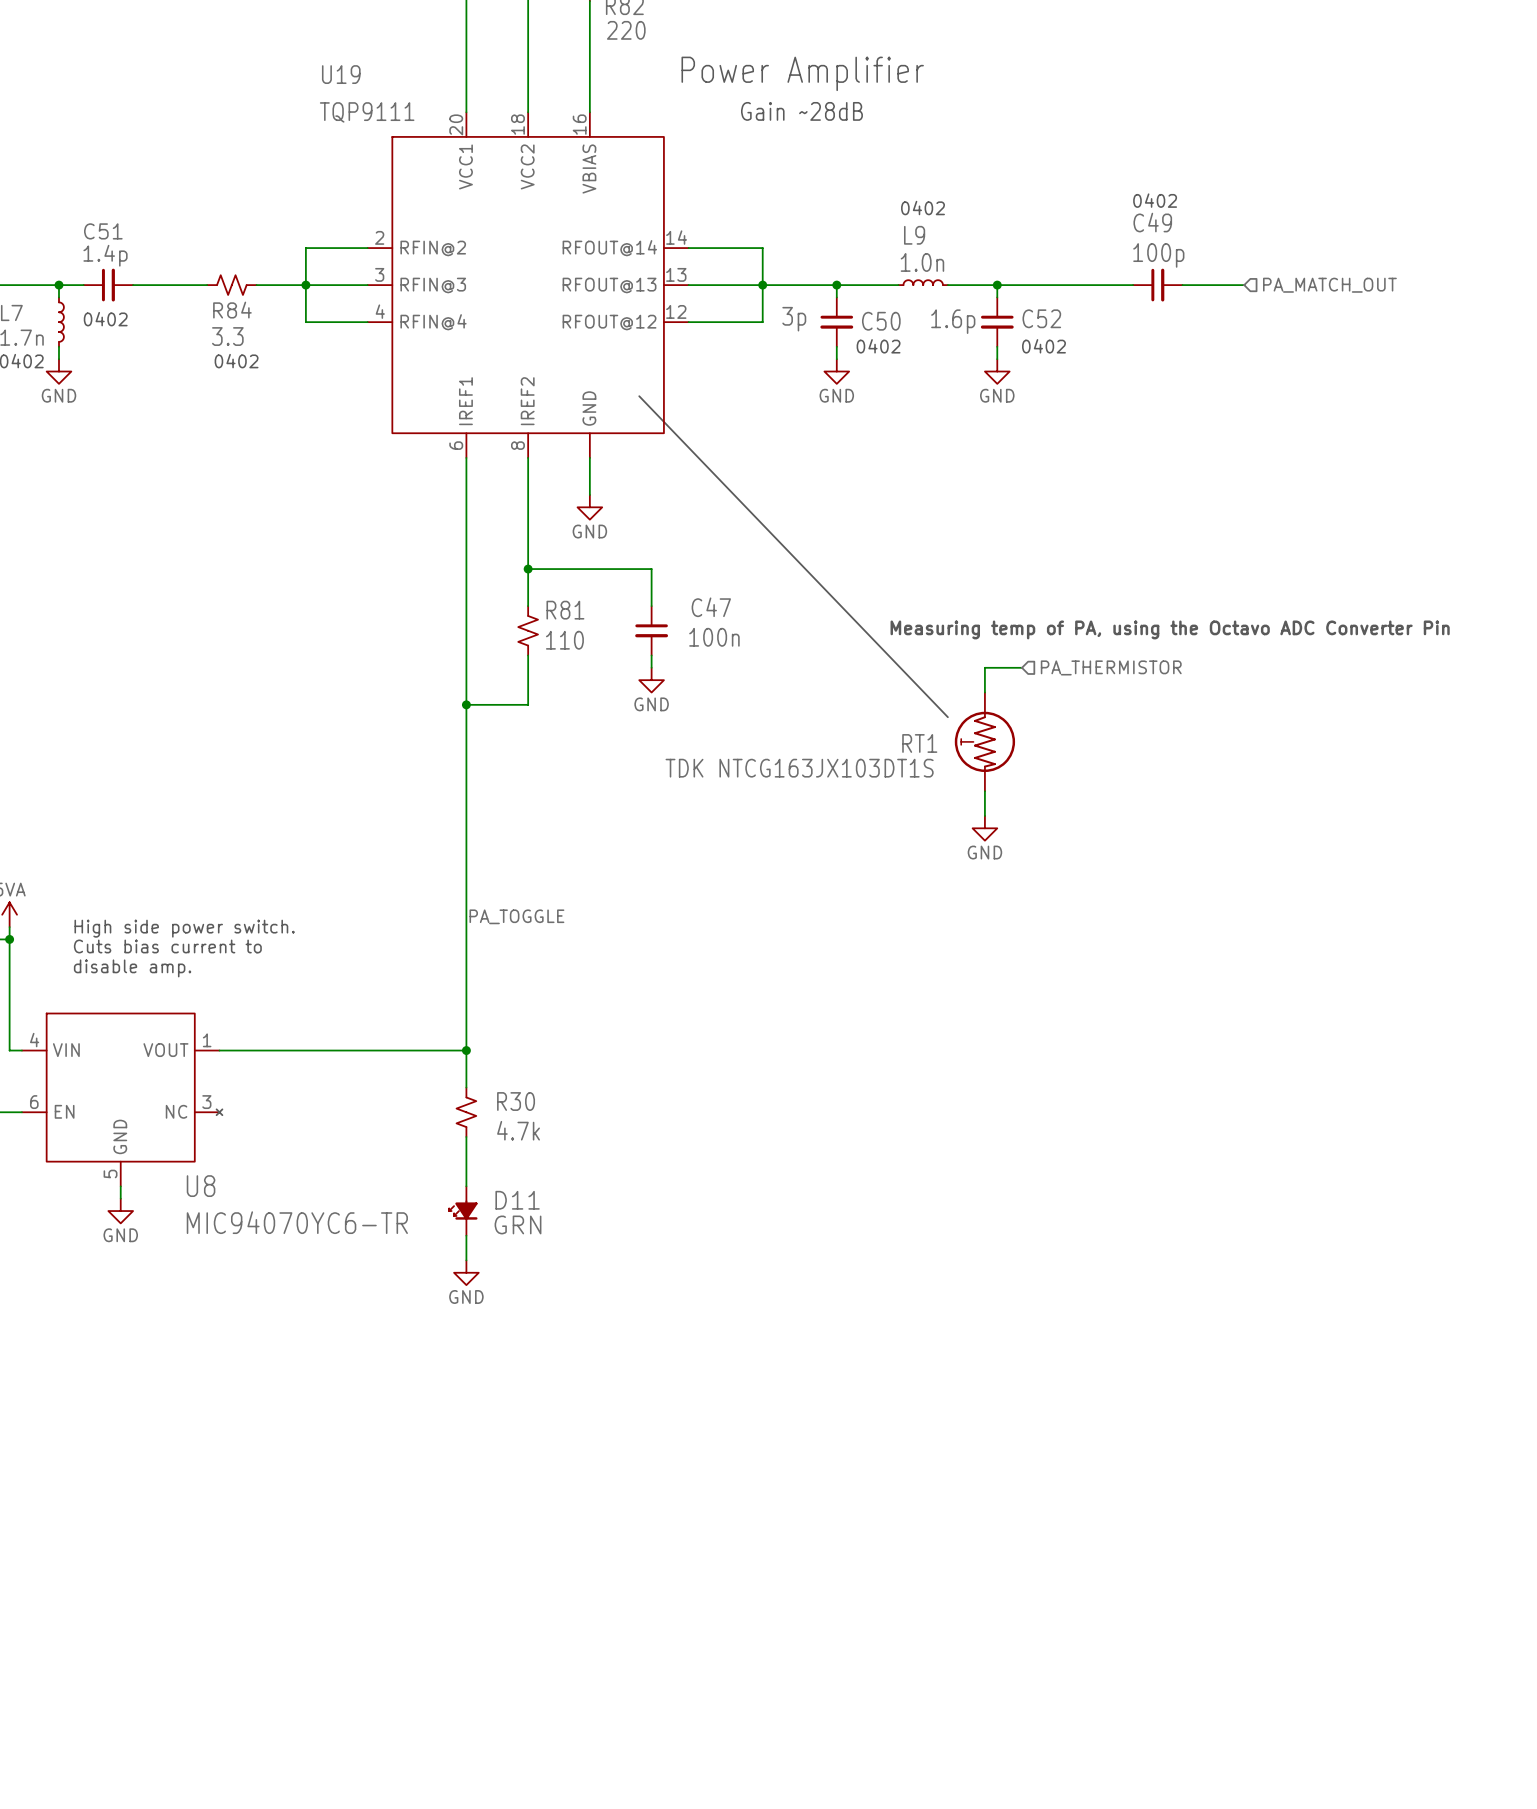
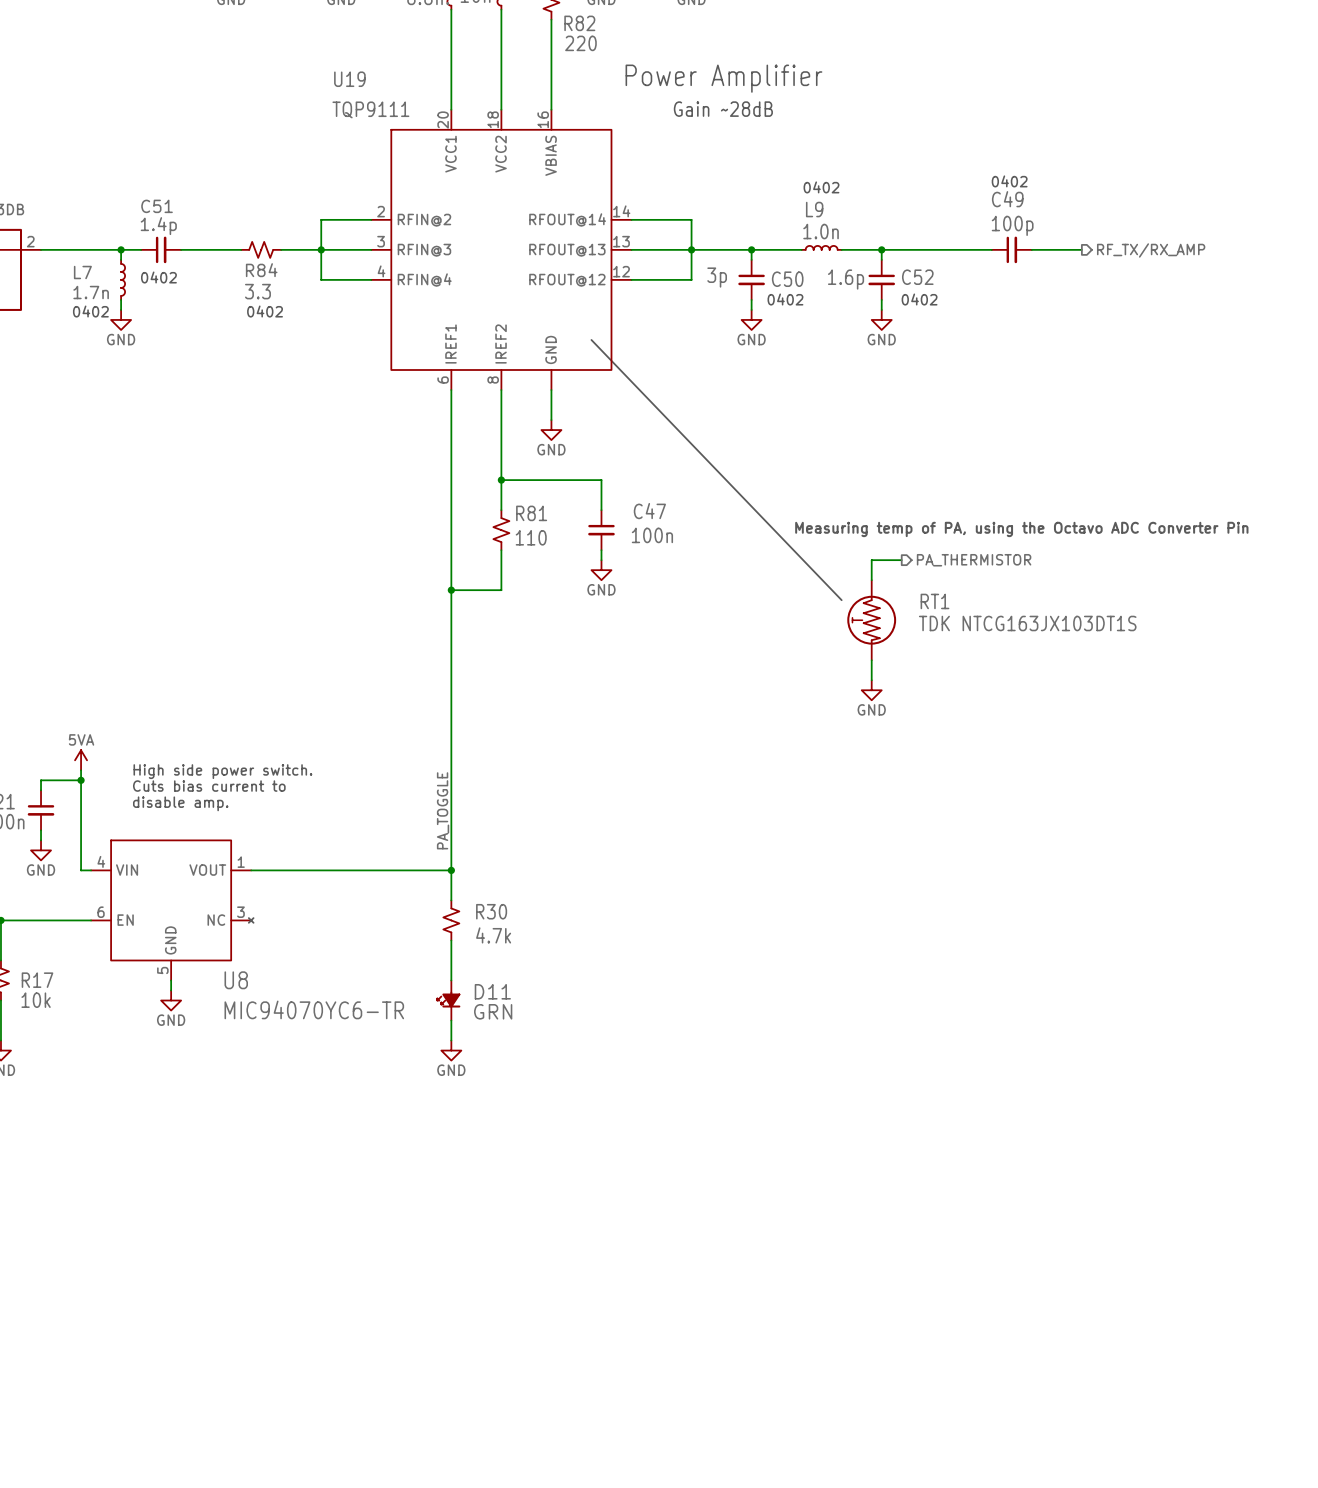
hierarchical label shape: input (1329, 285) -> output (1151, 250)
hierarchical label: PA_MATCH_OUT (1329, 285) -> RF_TX/RX_AMP (1151, 250)
hierarchical label shape: input (1111, 667) -> output (974, 560)
RT1 name position: RT1 (919, 743) -> RT1 (934, 601)
RT1 value position: TDK NTCG163JX103DT1S (799, 768) -> TDK NTCG163JX103DT1S (1027, 623)
label rotation: 0° (516, 916) -> 90° counterclockwise (443, 810)

